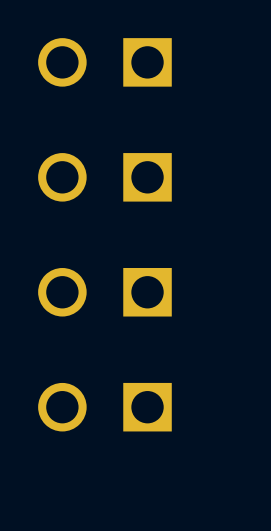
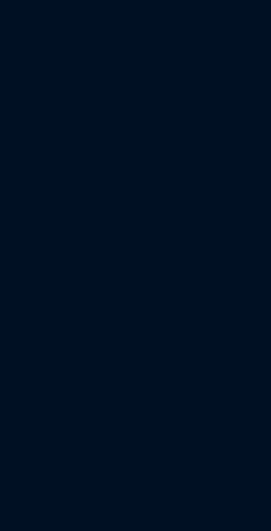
part: (104, 62) -> none
part: (104, 177) -> none
part: (104, 292) -> none
part: (104, 407) -> none

